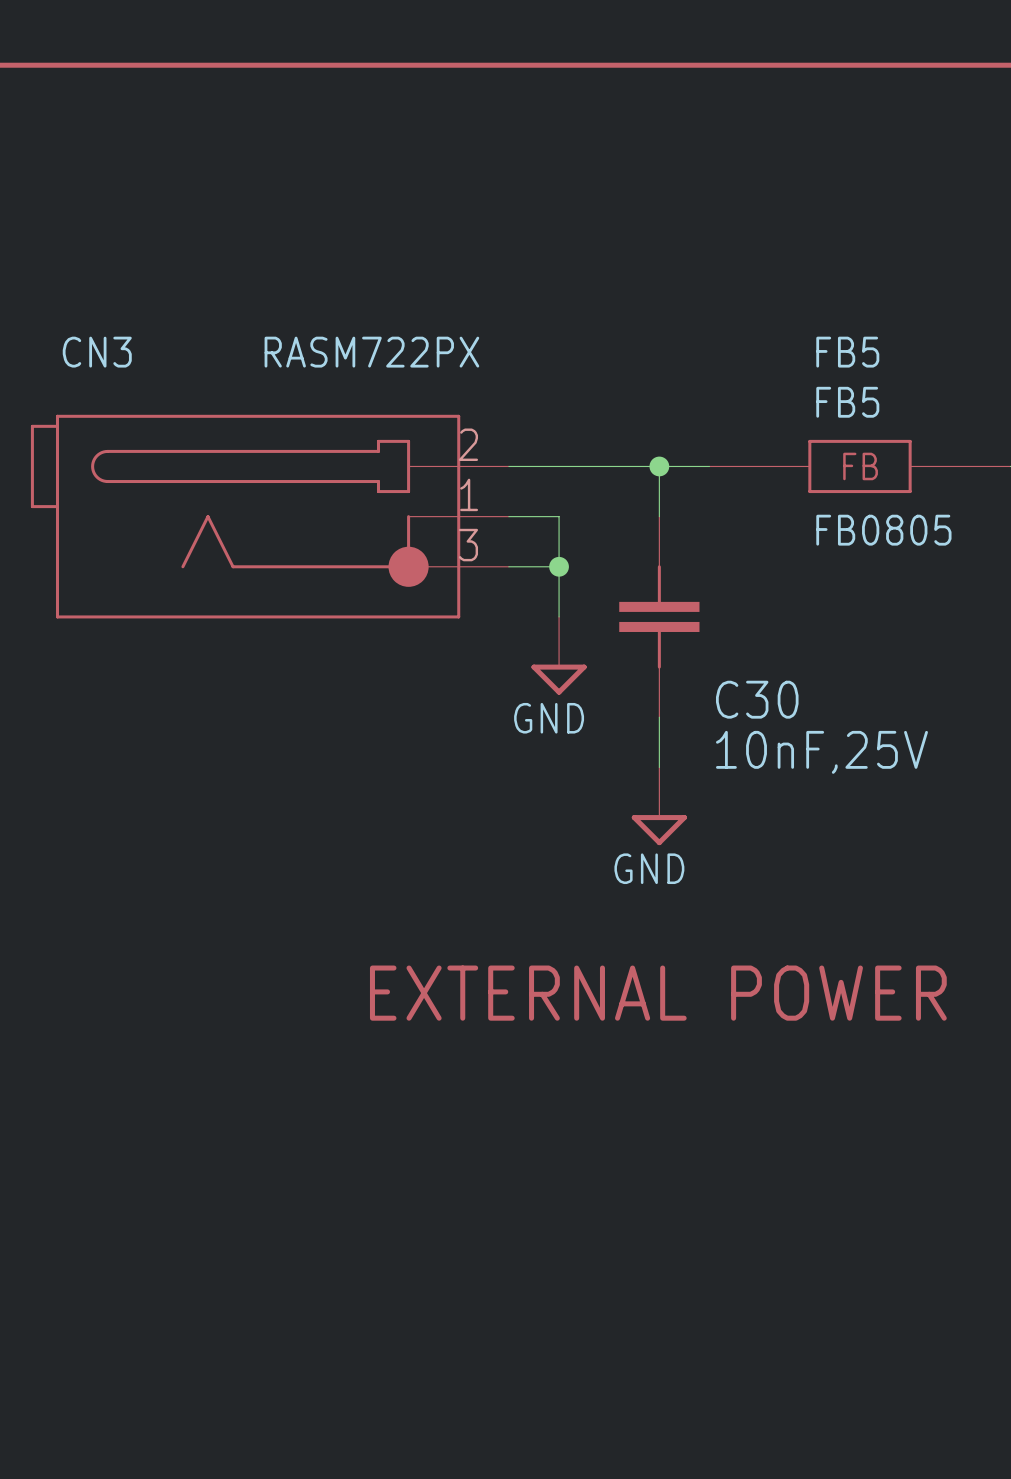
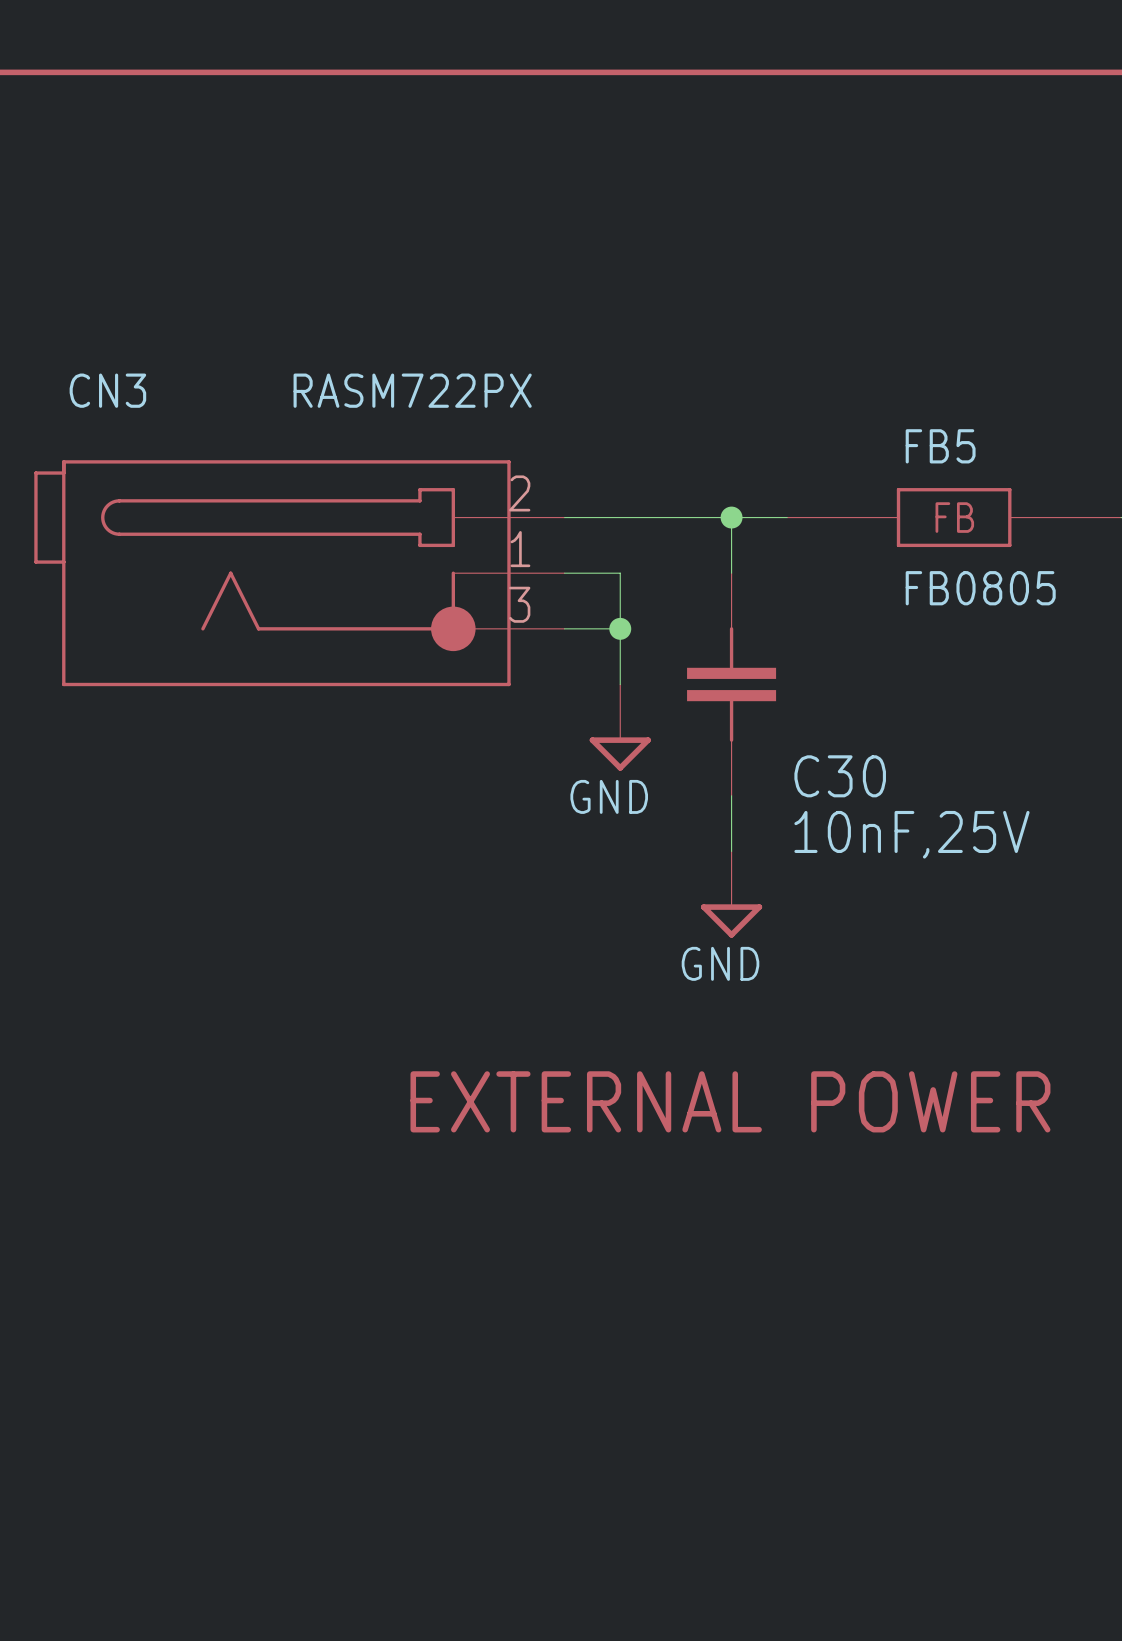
text: FB5 (847, 352) -> none

